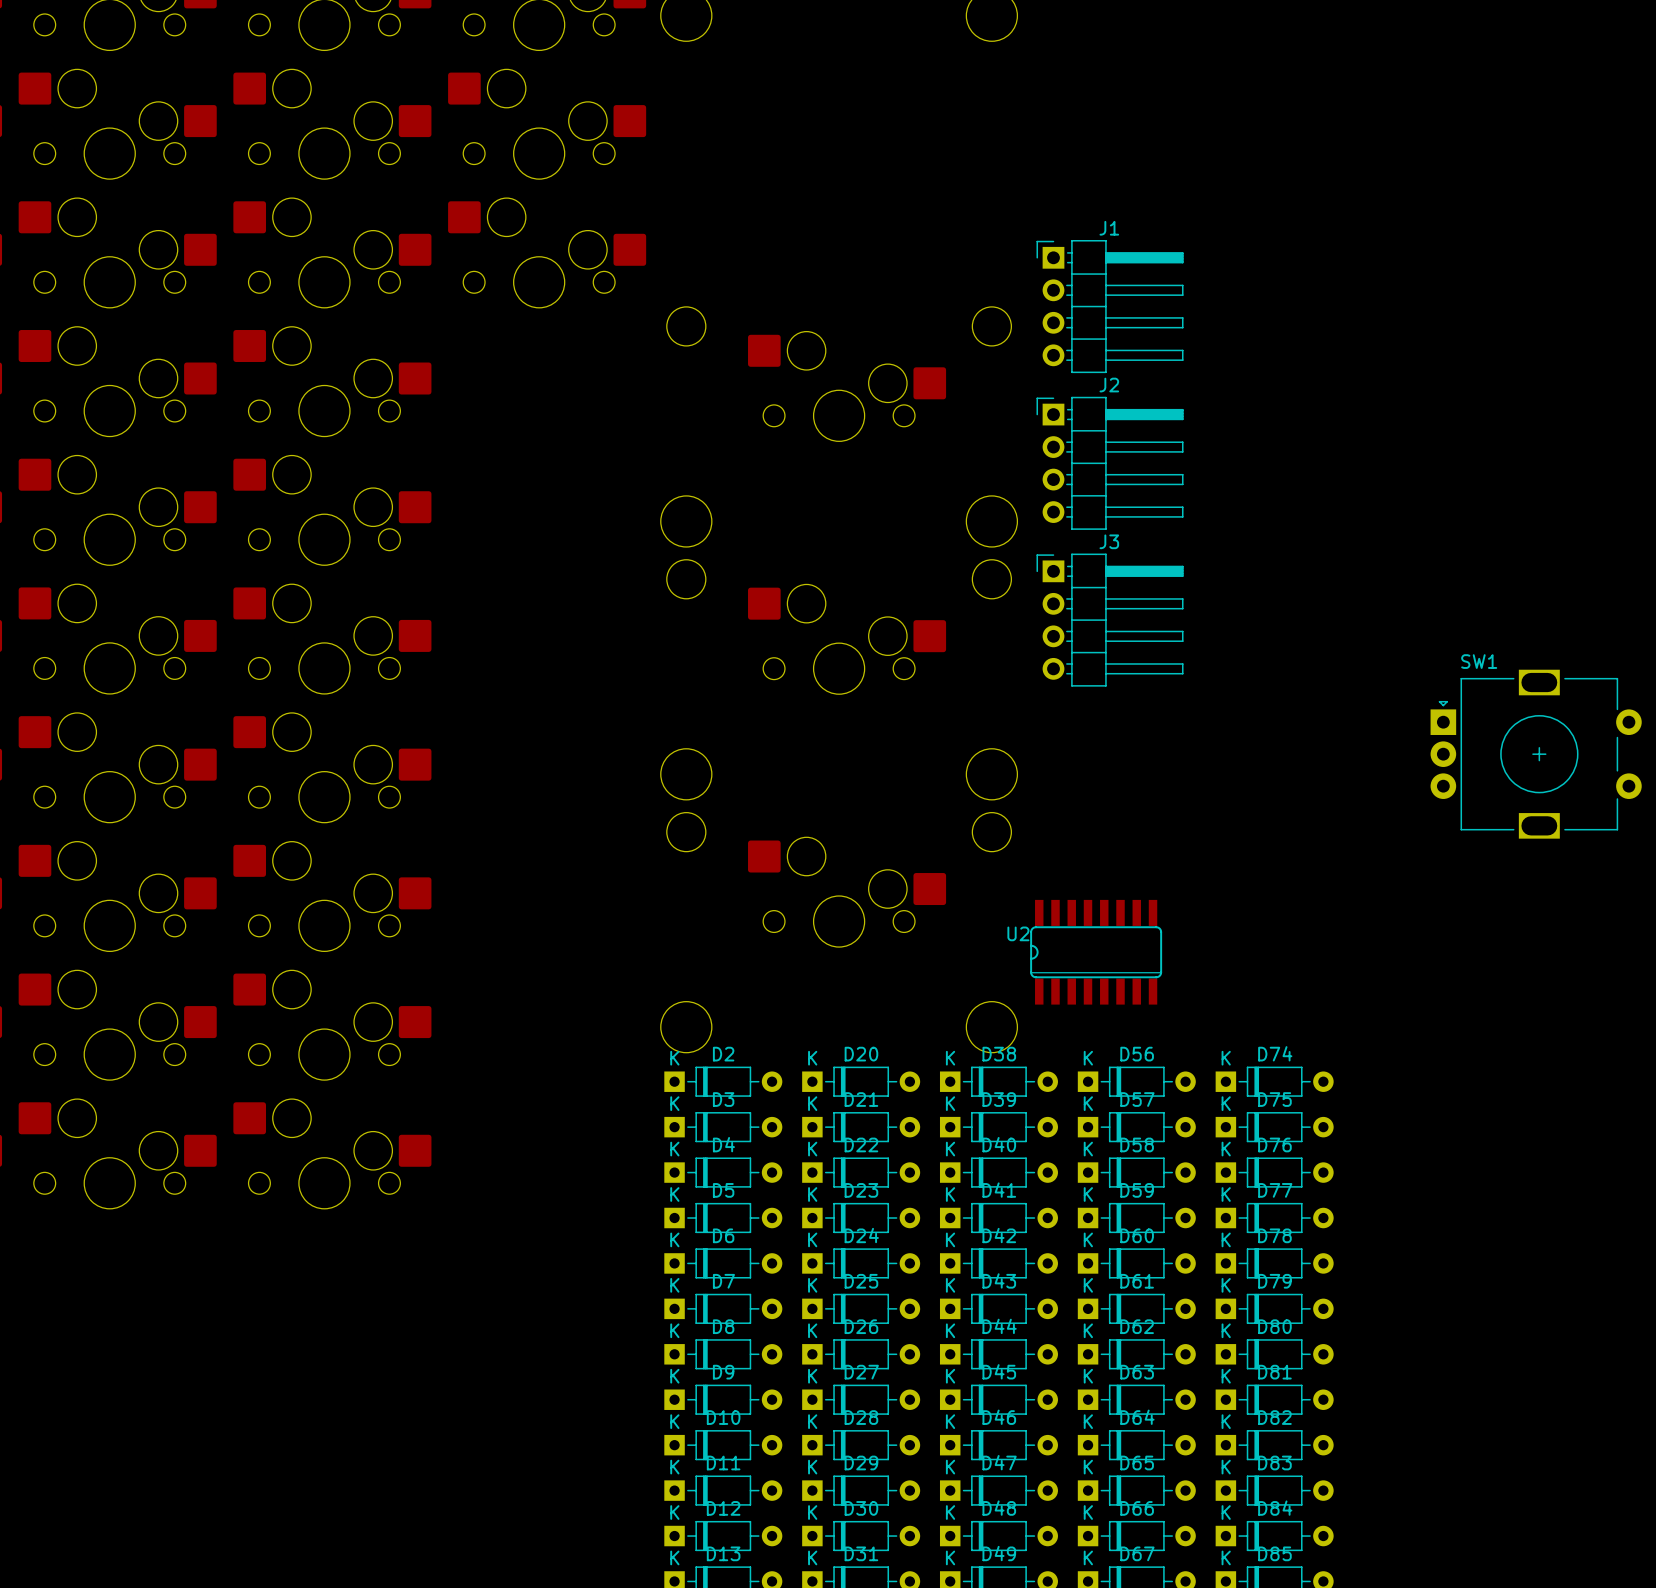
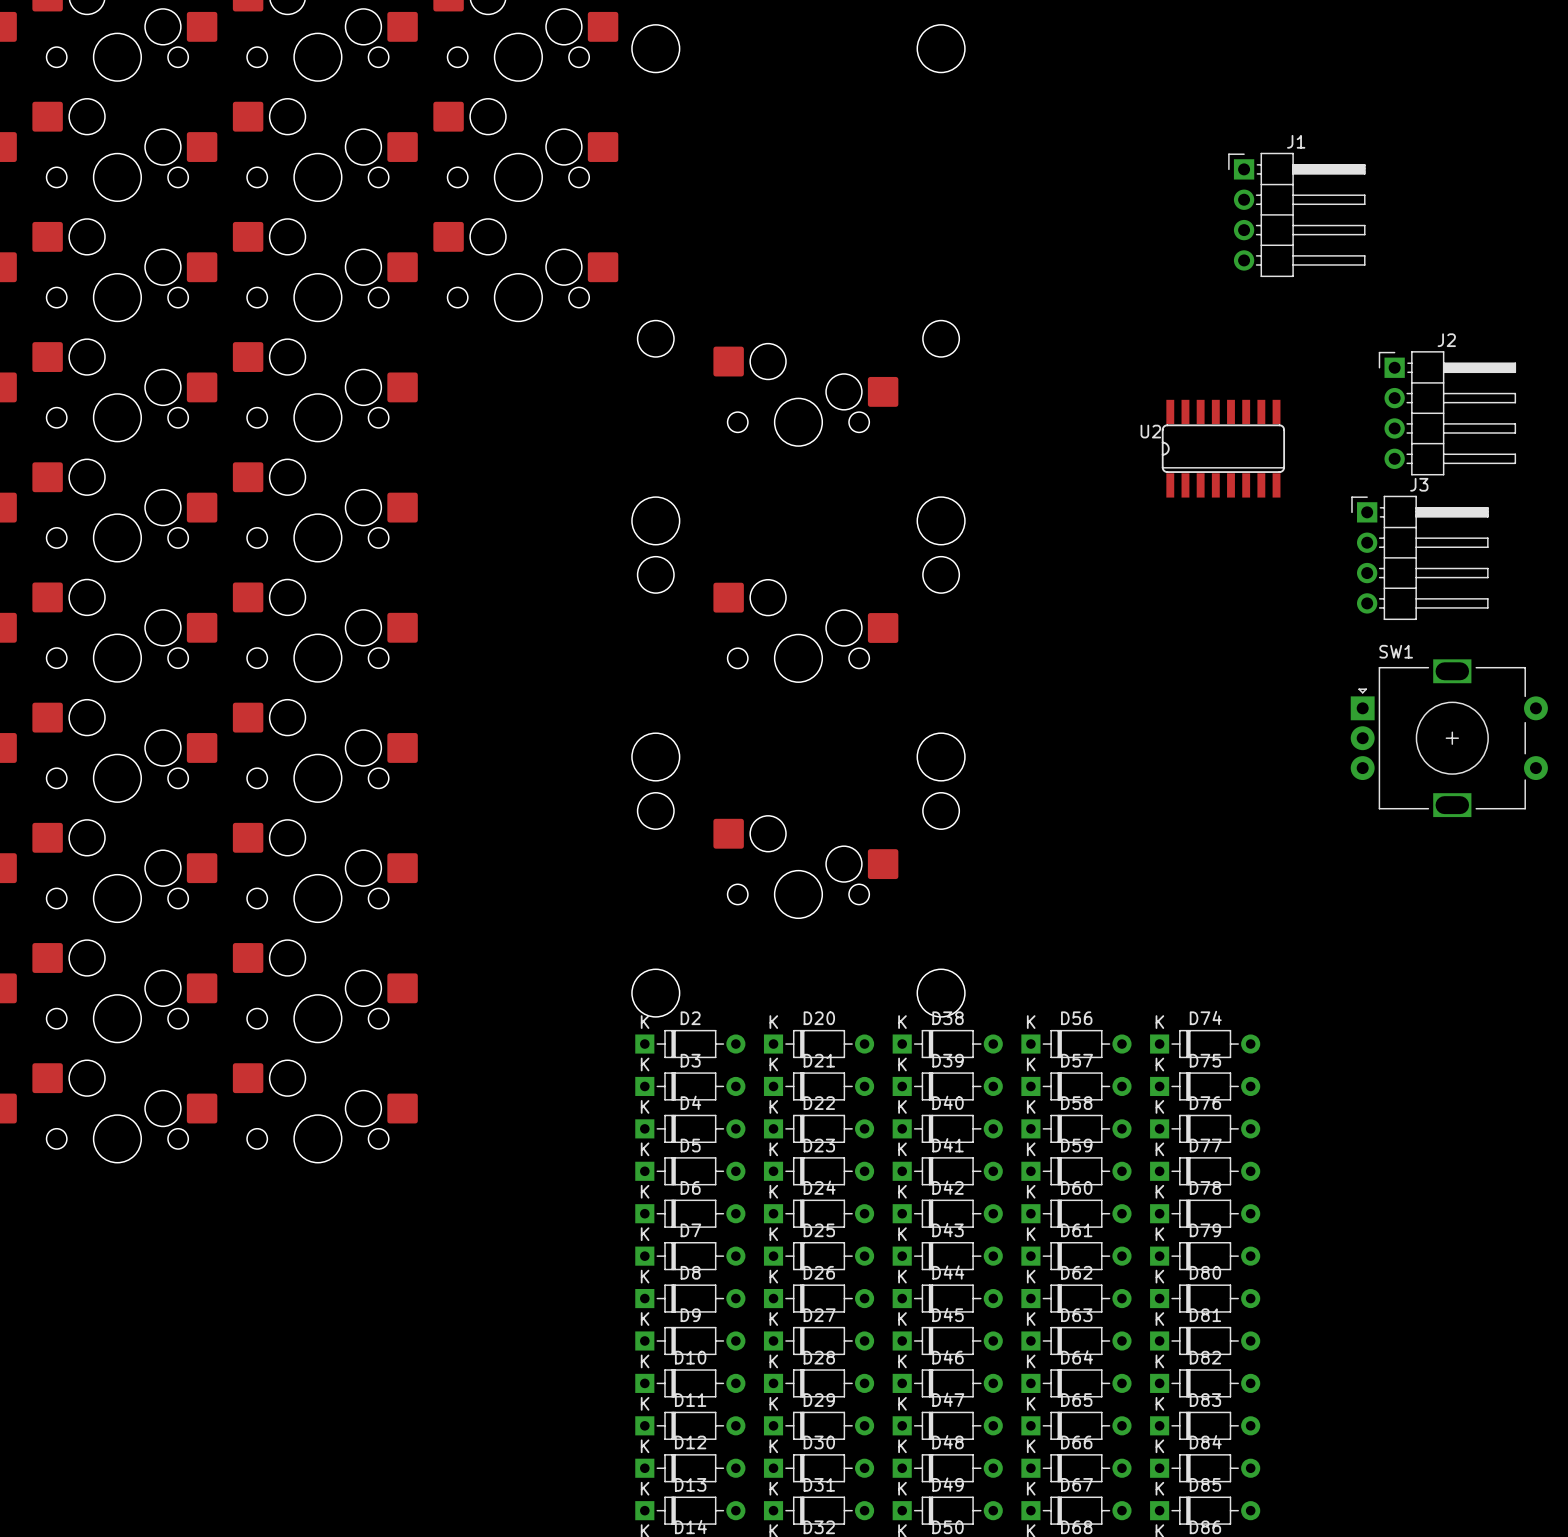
J1 position: (1110, 306) -> (1296, 214)
J2 position: (1110, 463) -> (1447, 413)
J3 position: (1110, 620) -> (1419, 557)
U2 position: (1096, 952) -> (1223, 448)

